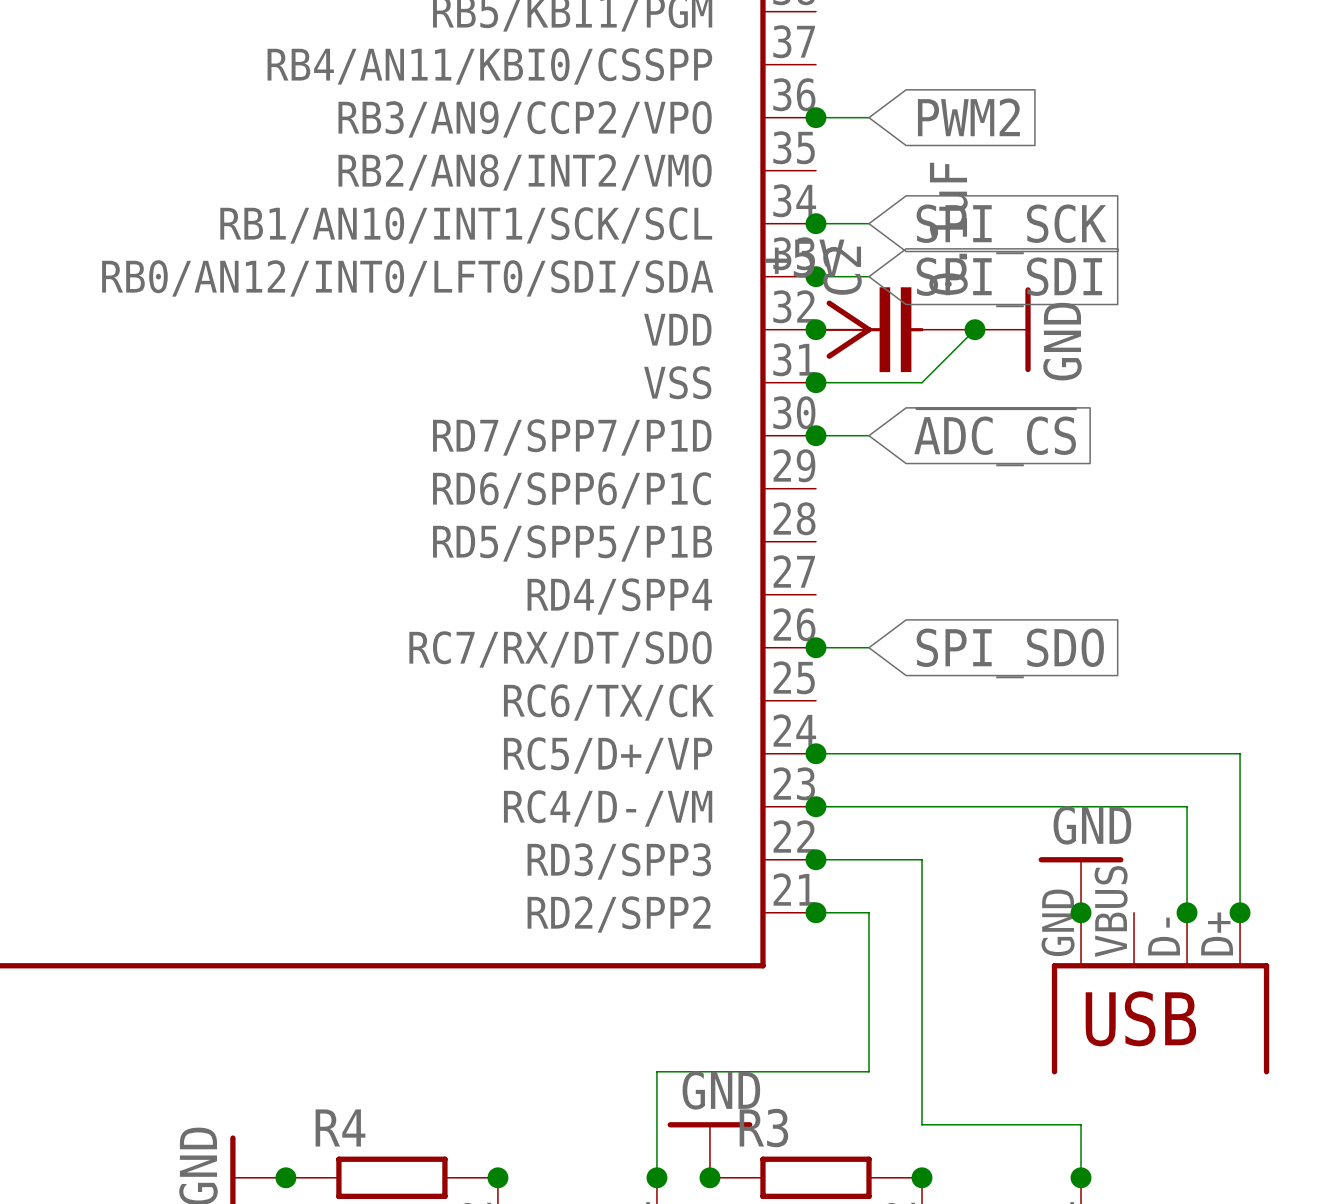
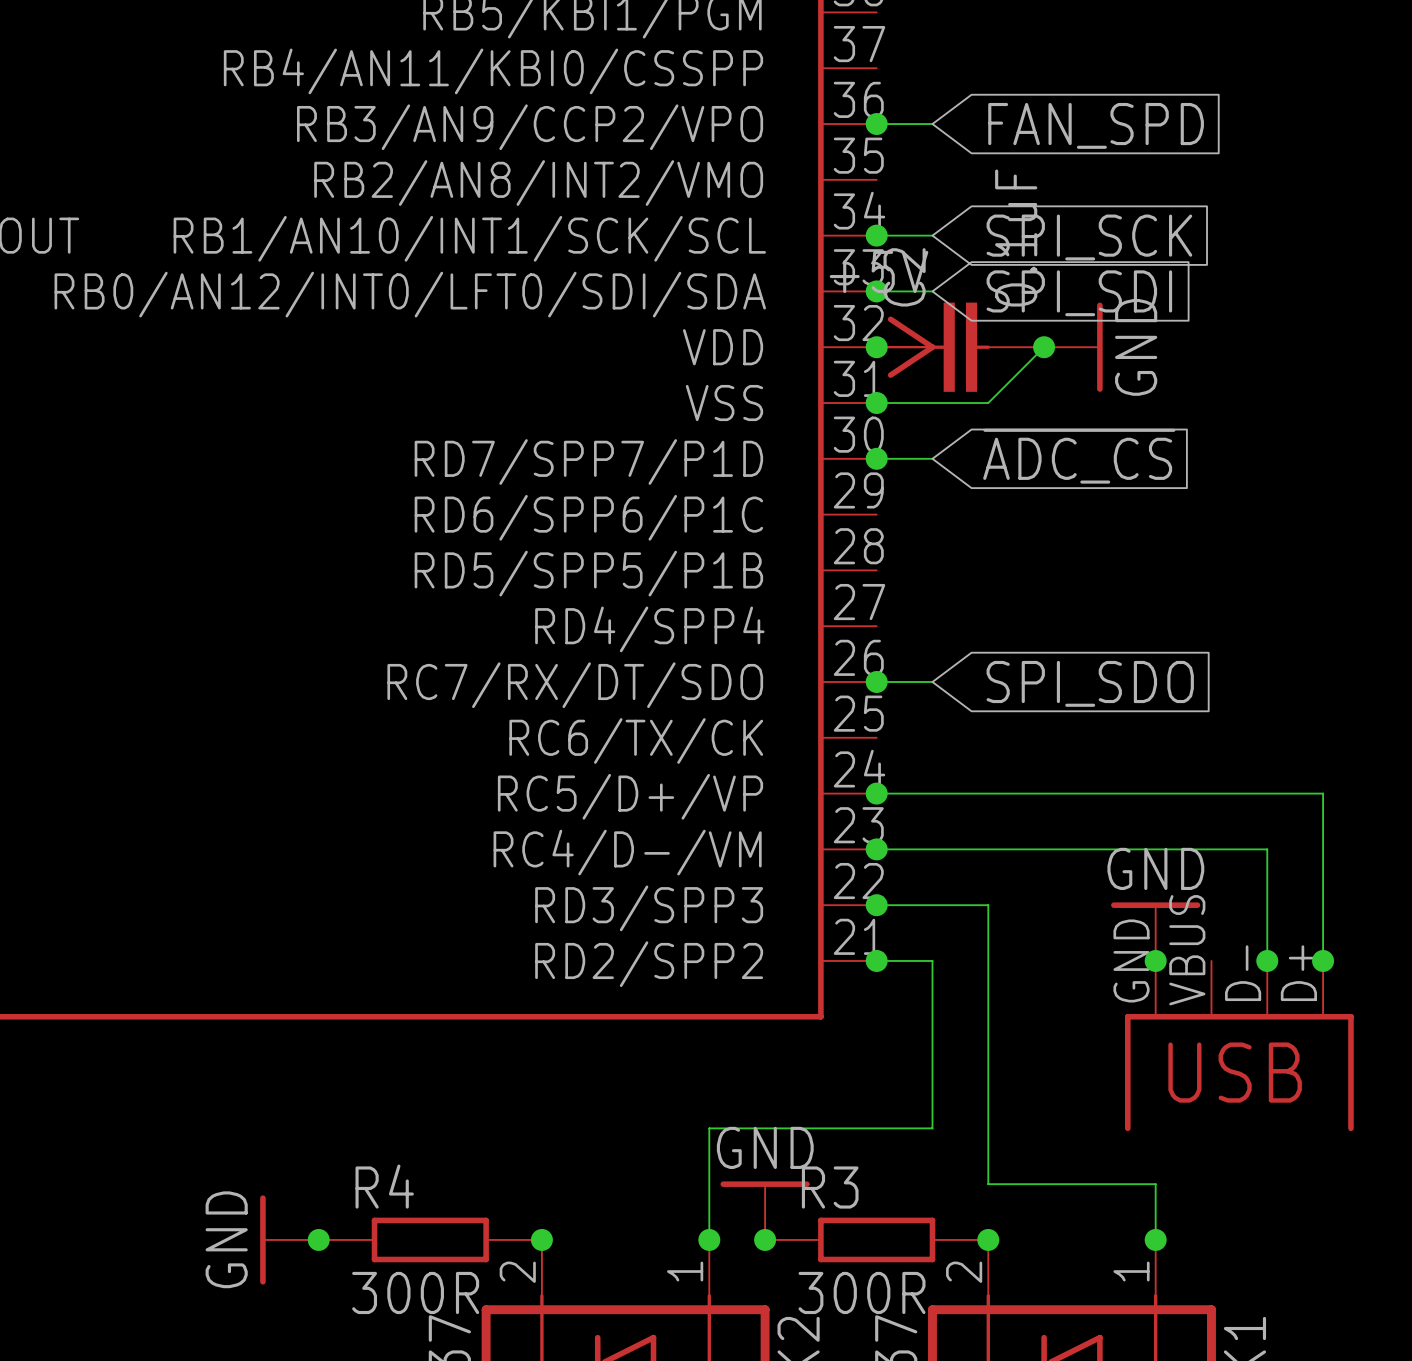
global label: PWM2 (968, 117) -> FAN_SPD (1096, 125)

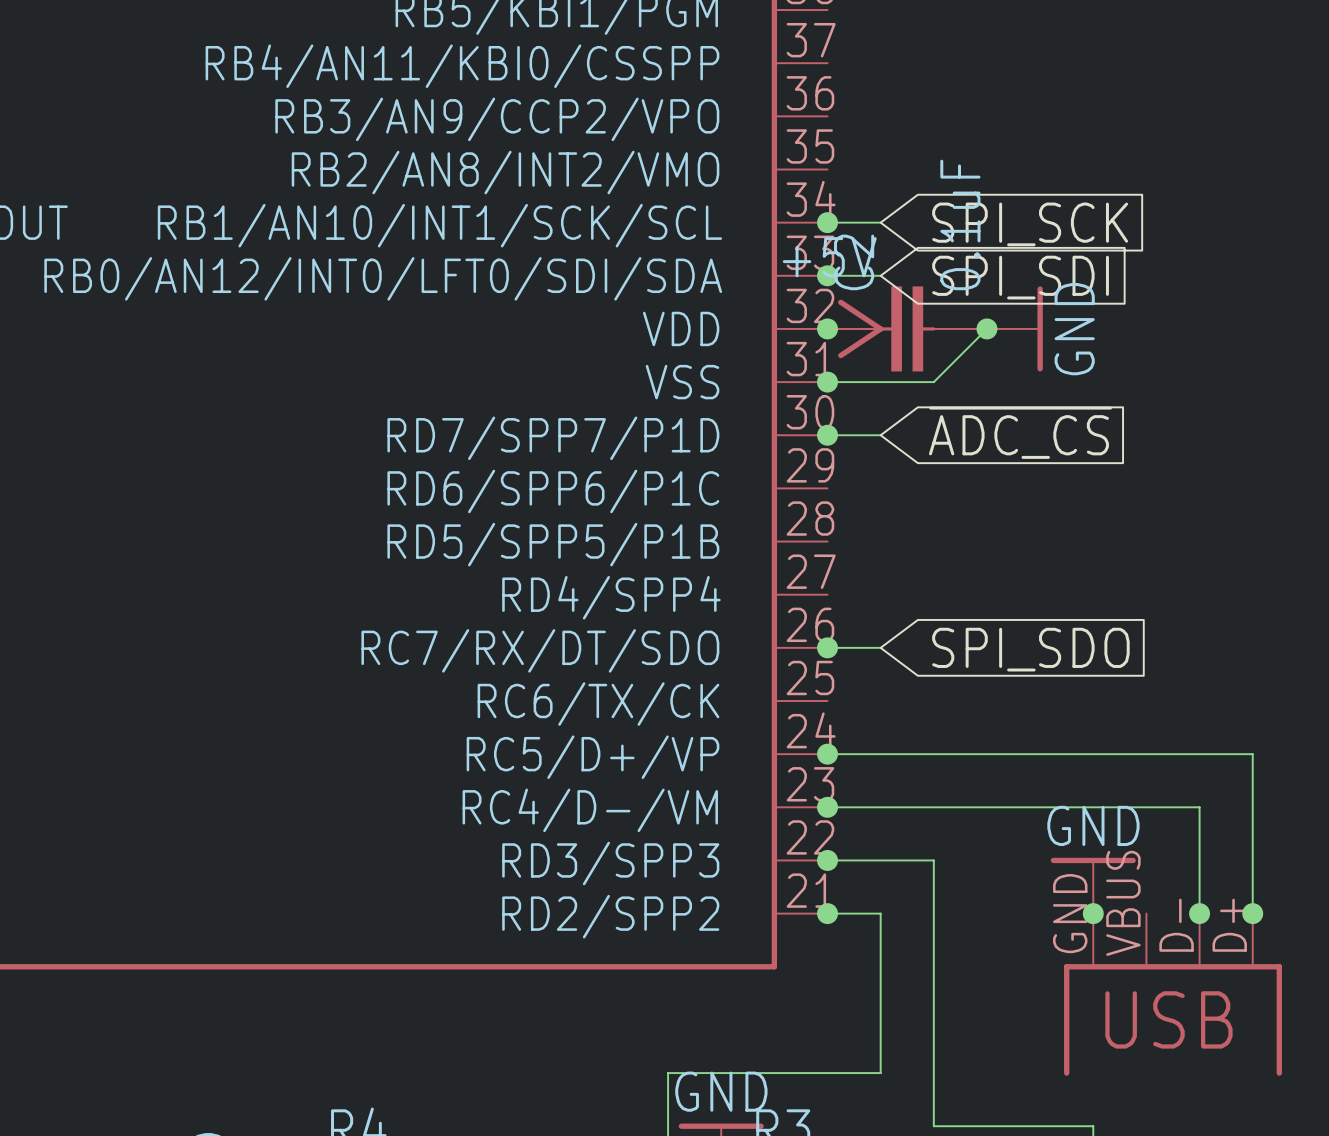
wire: (876, 124) (932, 124) -> none
junction: (876, 124) -> none
global label: FAN_SPD (1096, 125) -> none

